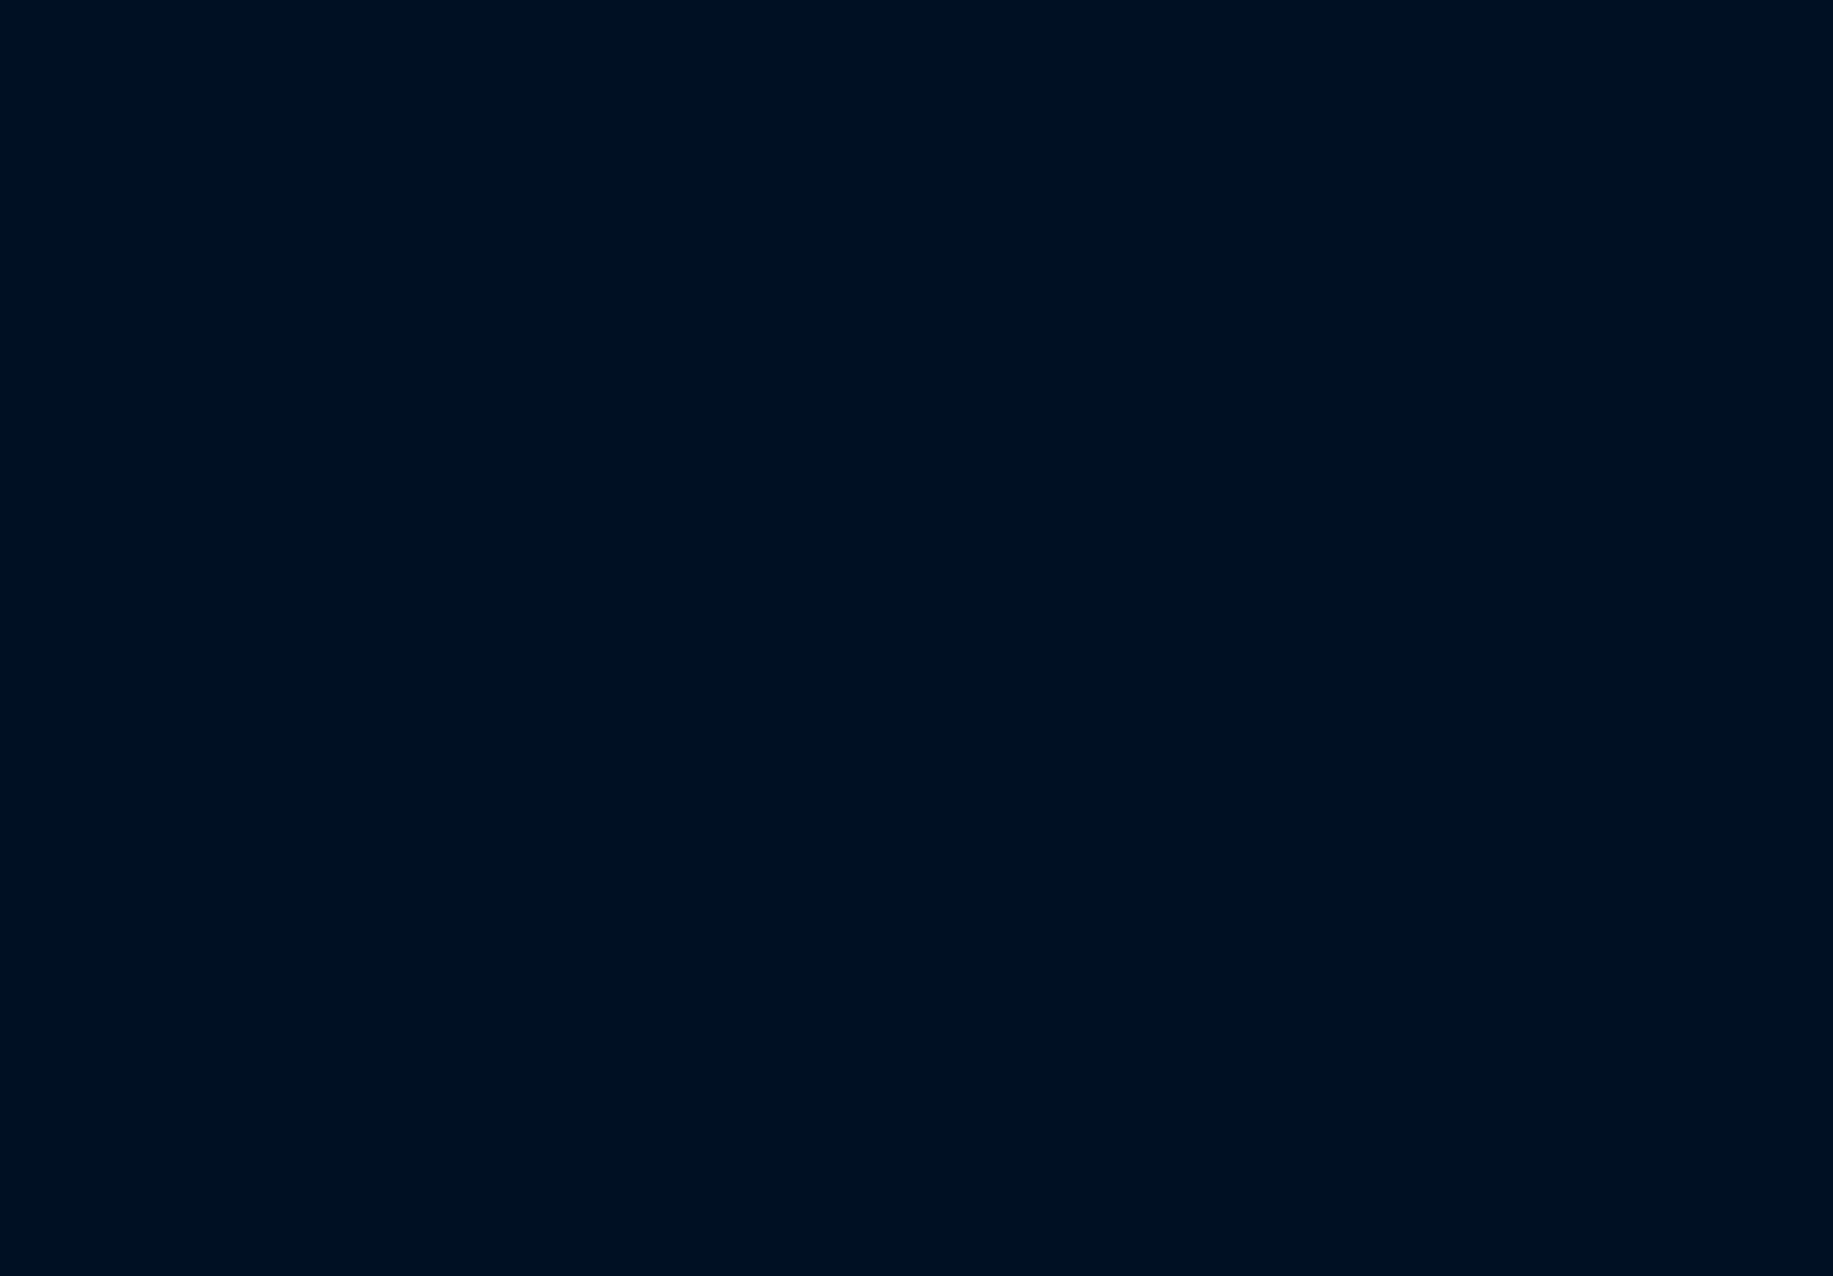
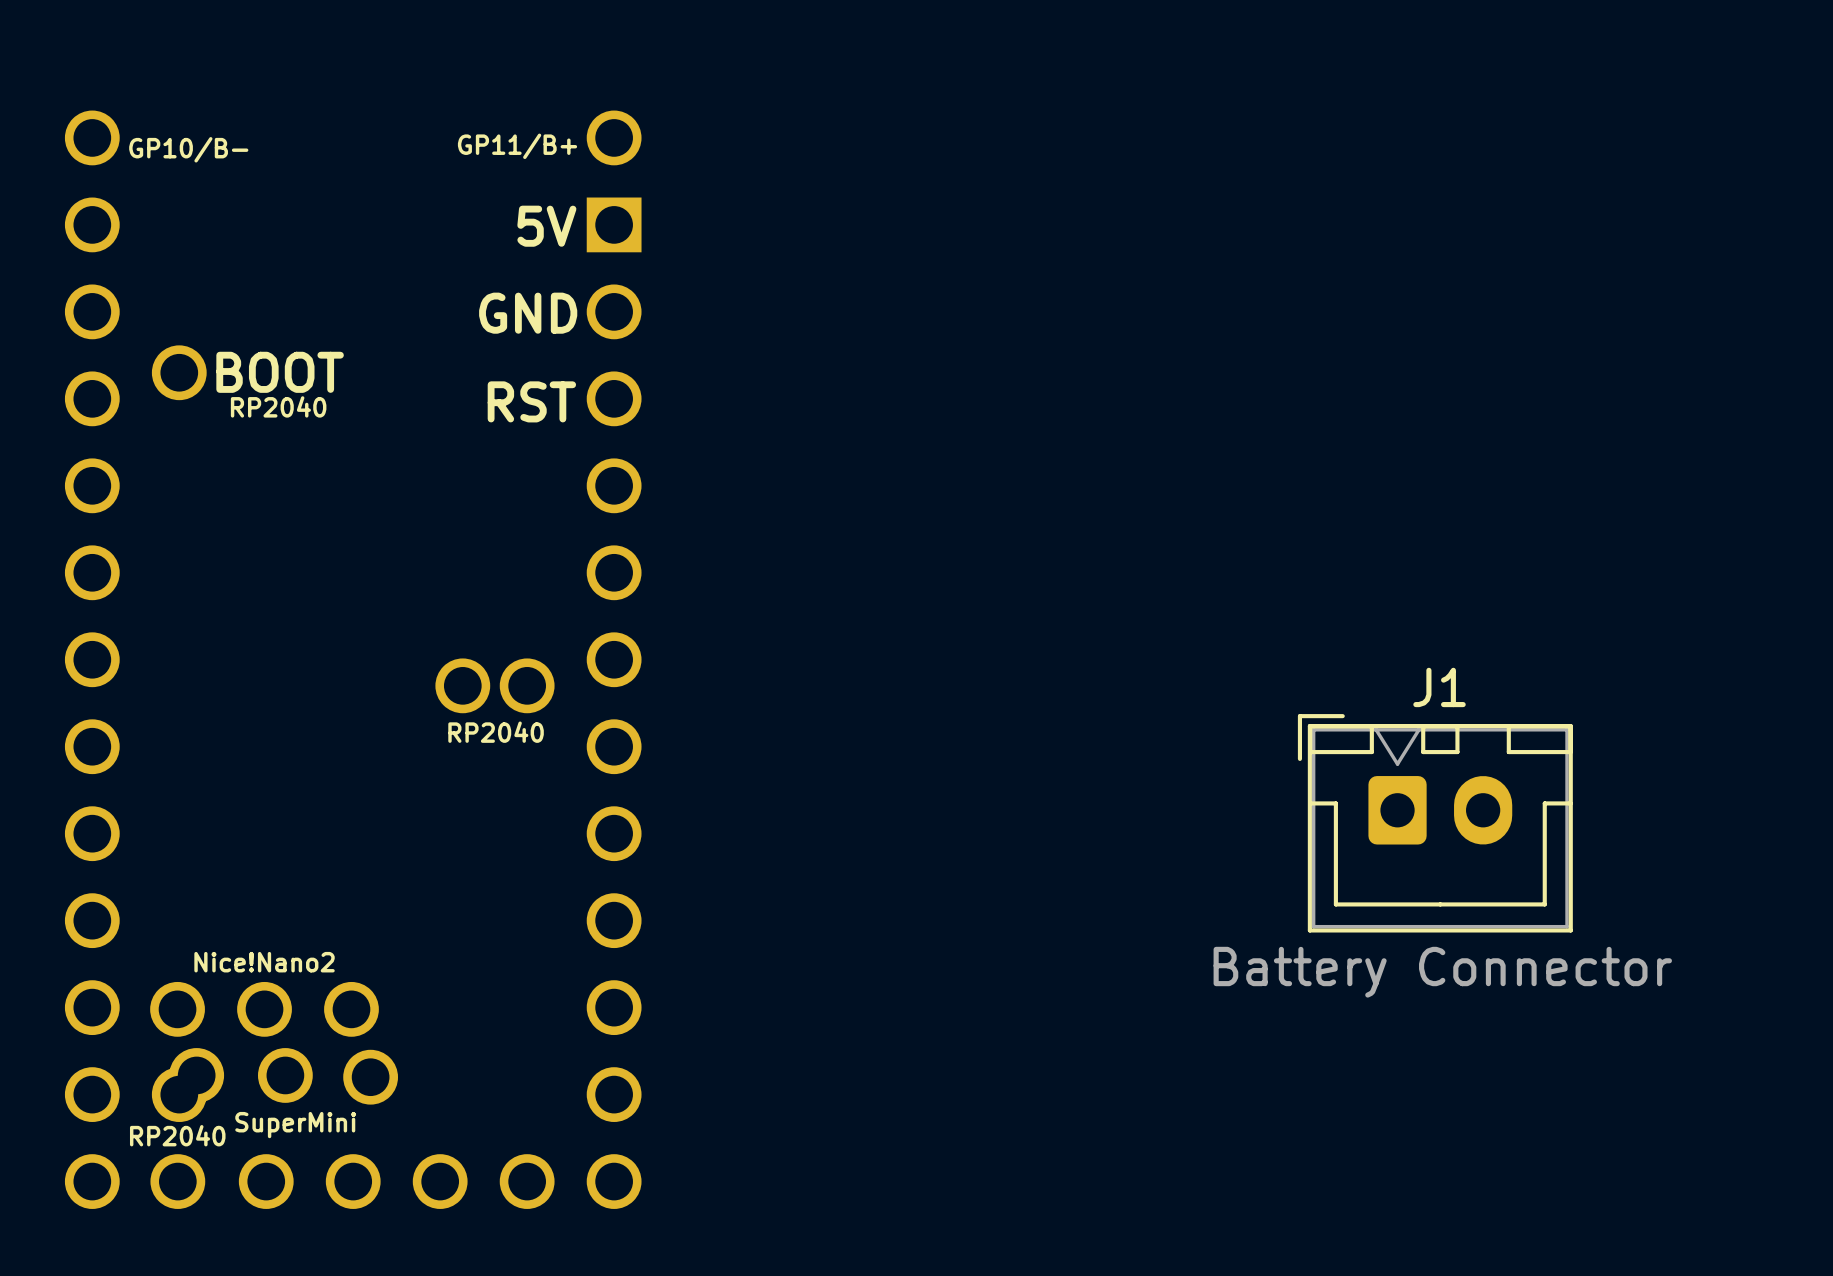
part: none -> (353, 659)
J1: none -> Battery Connector (1435, 823)

